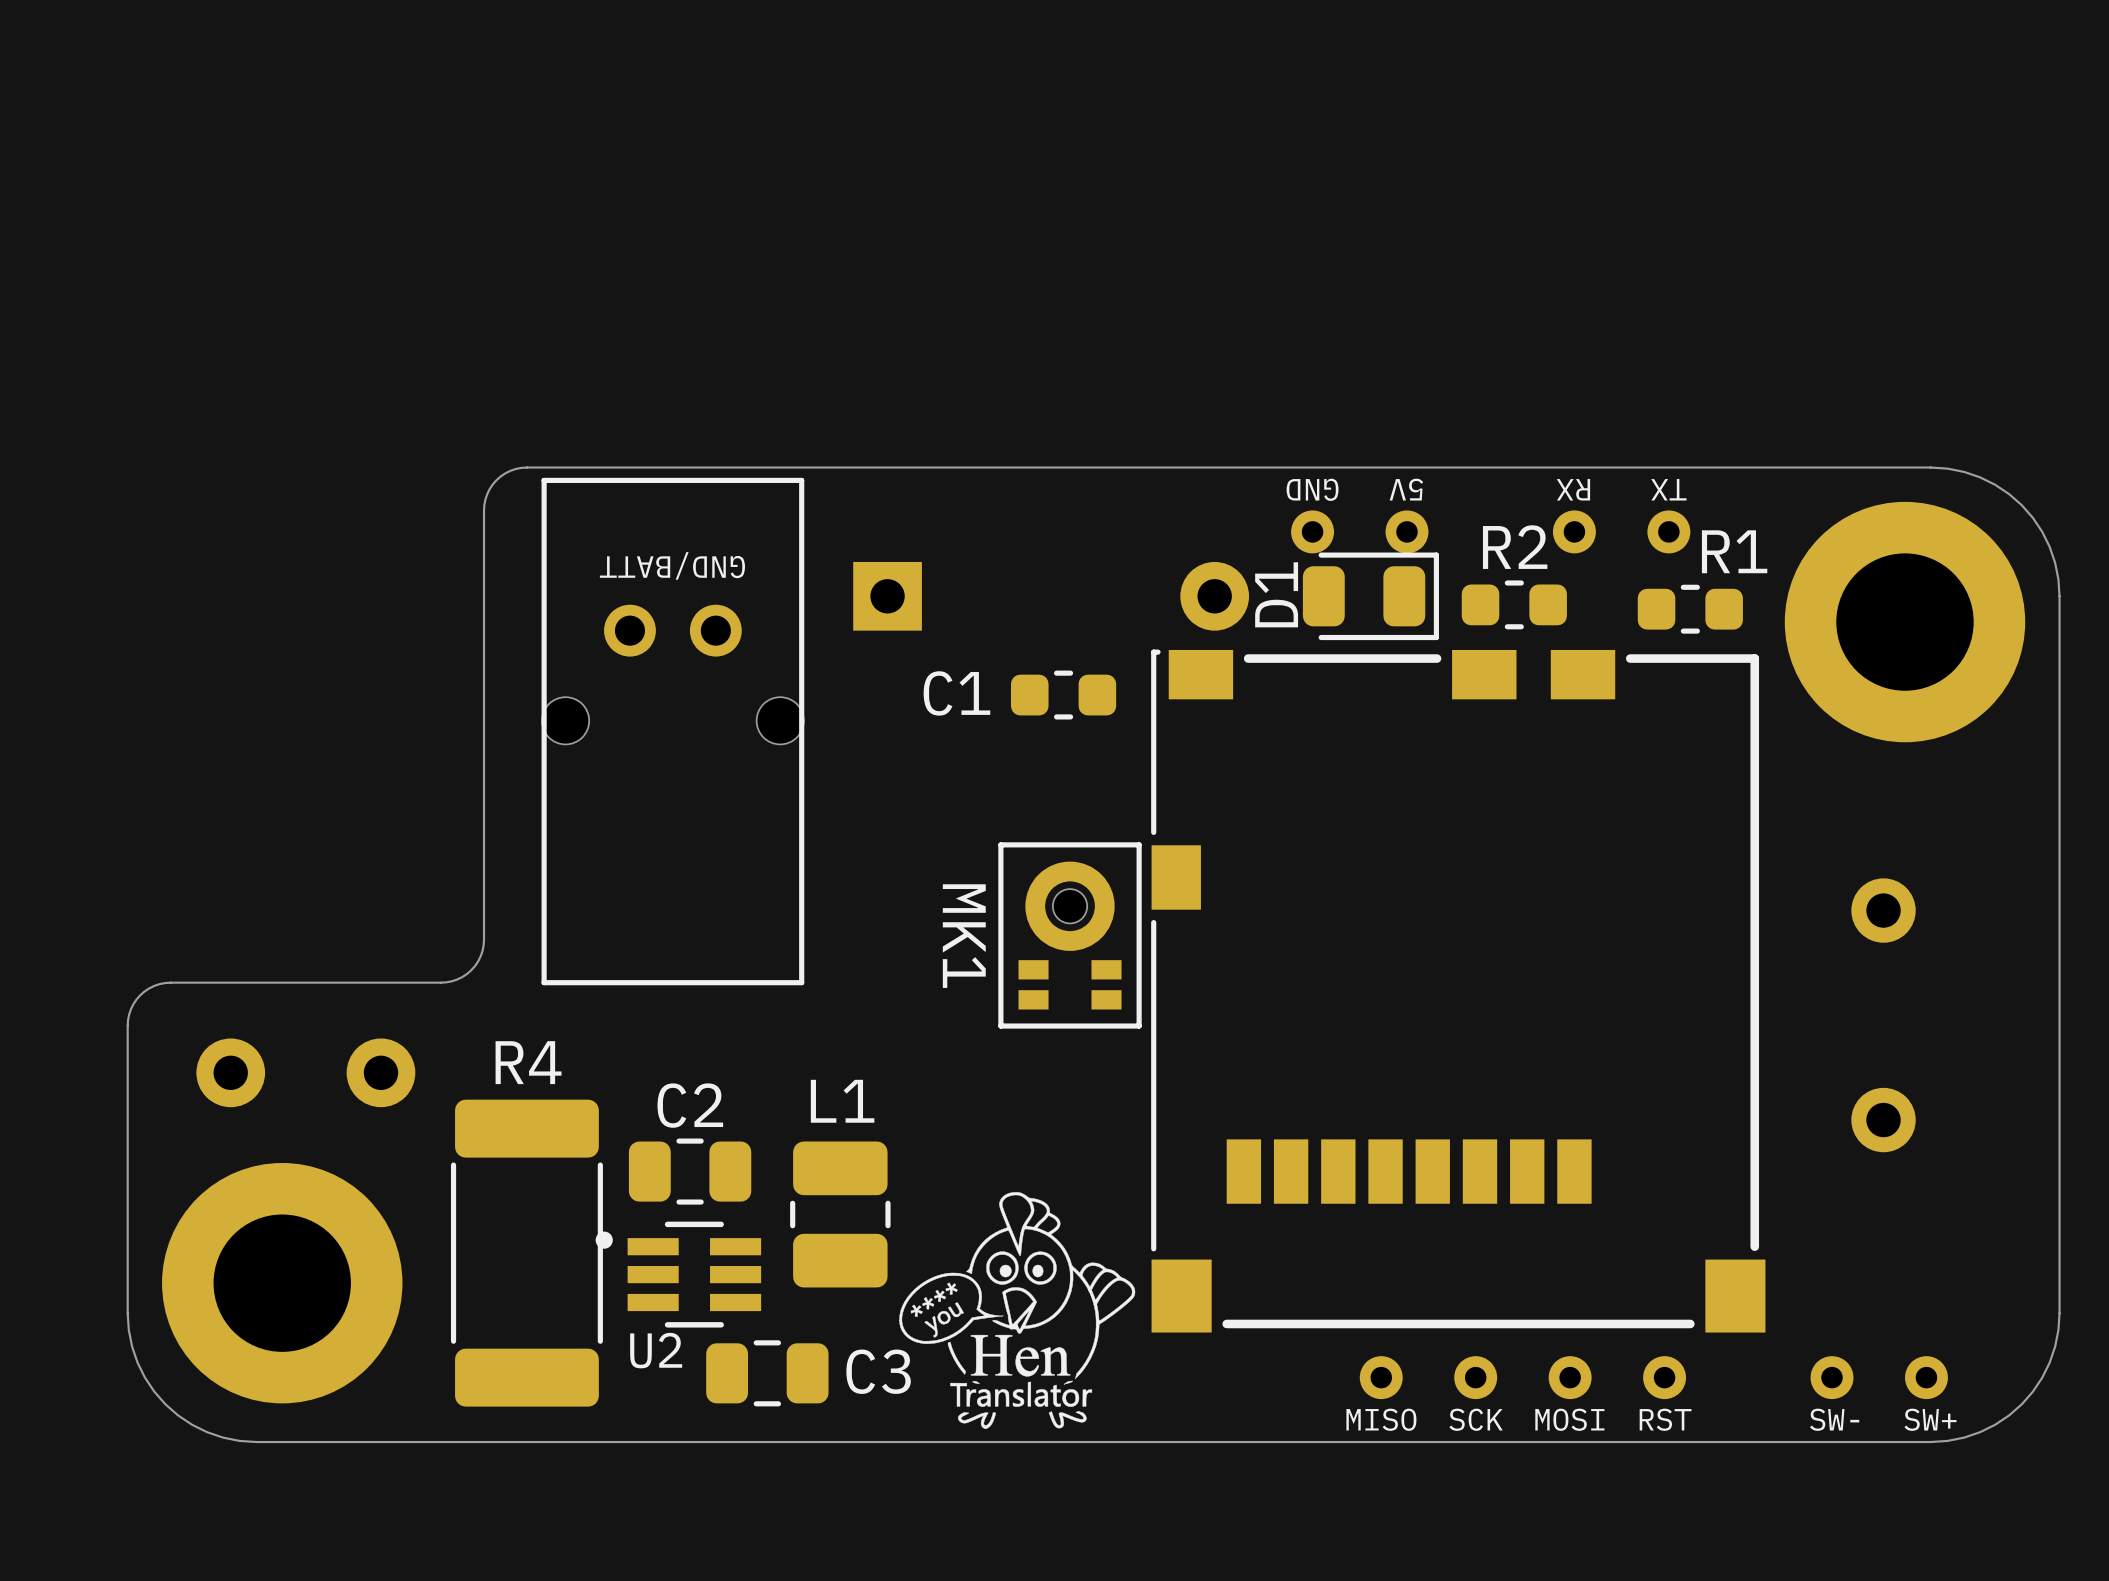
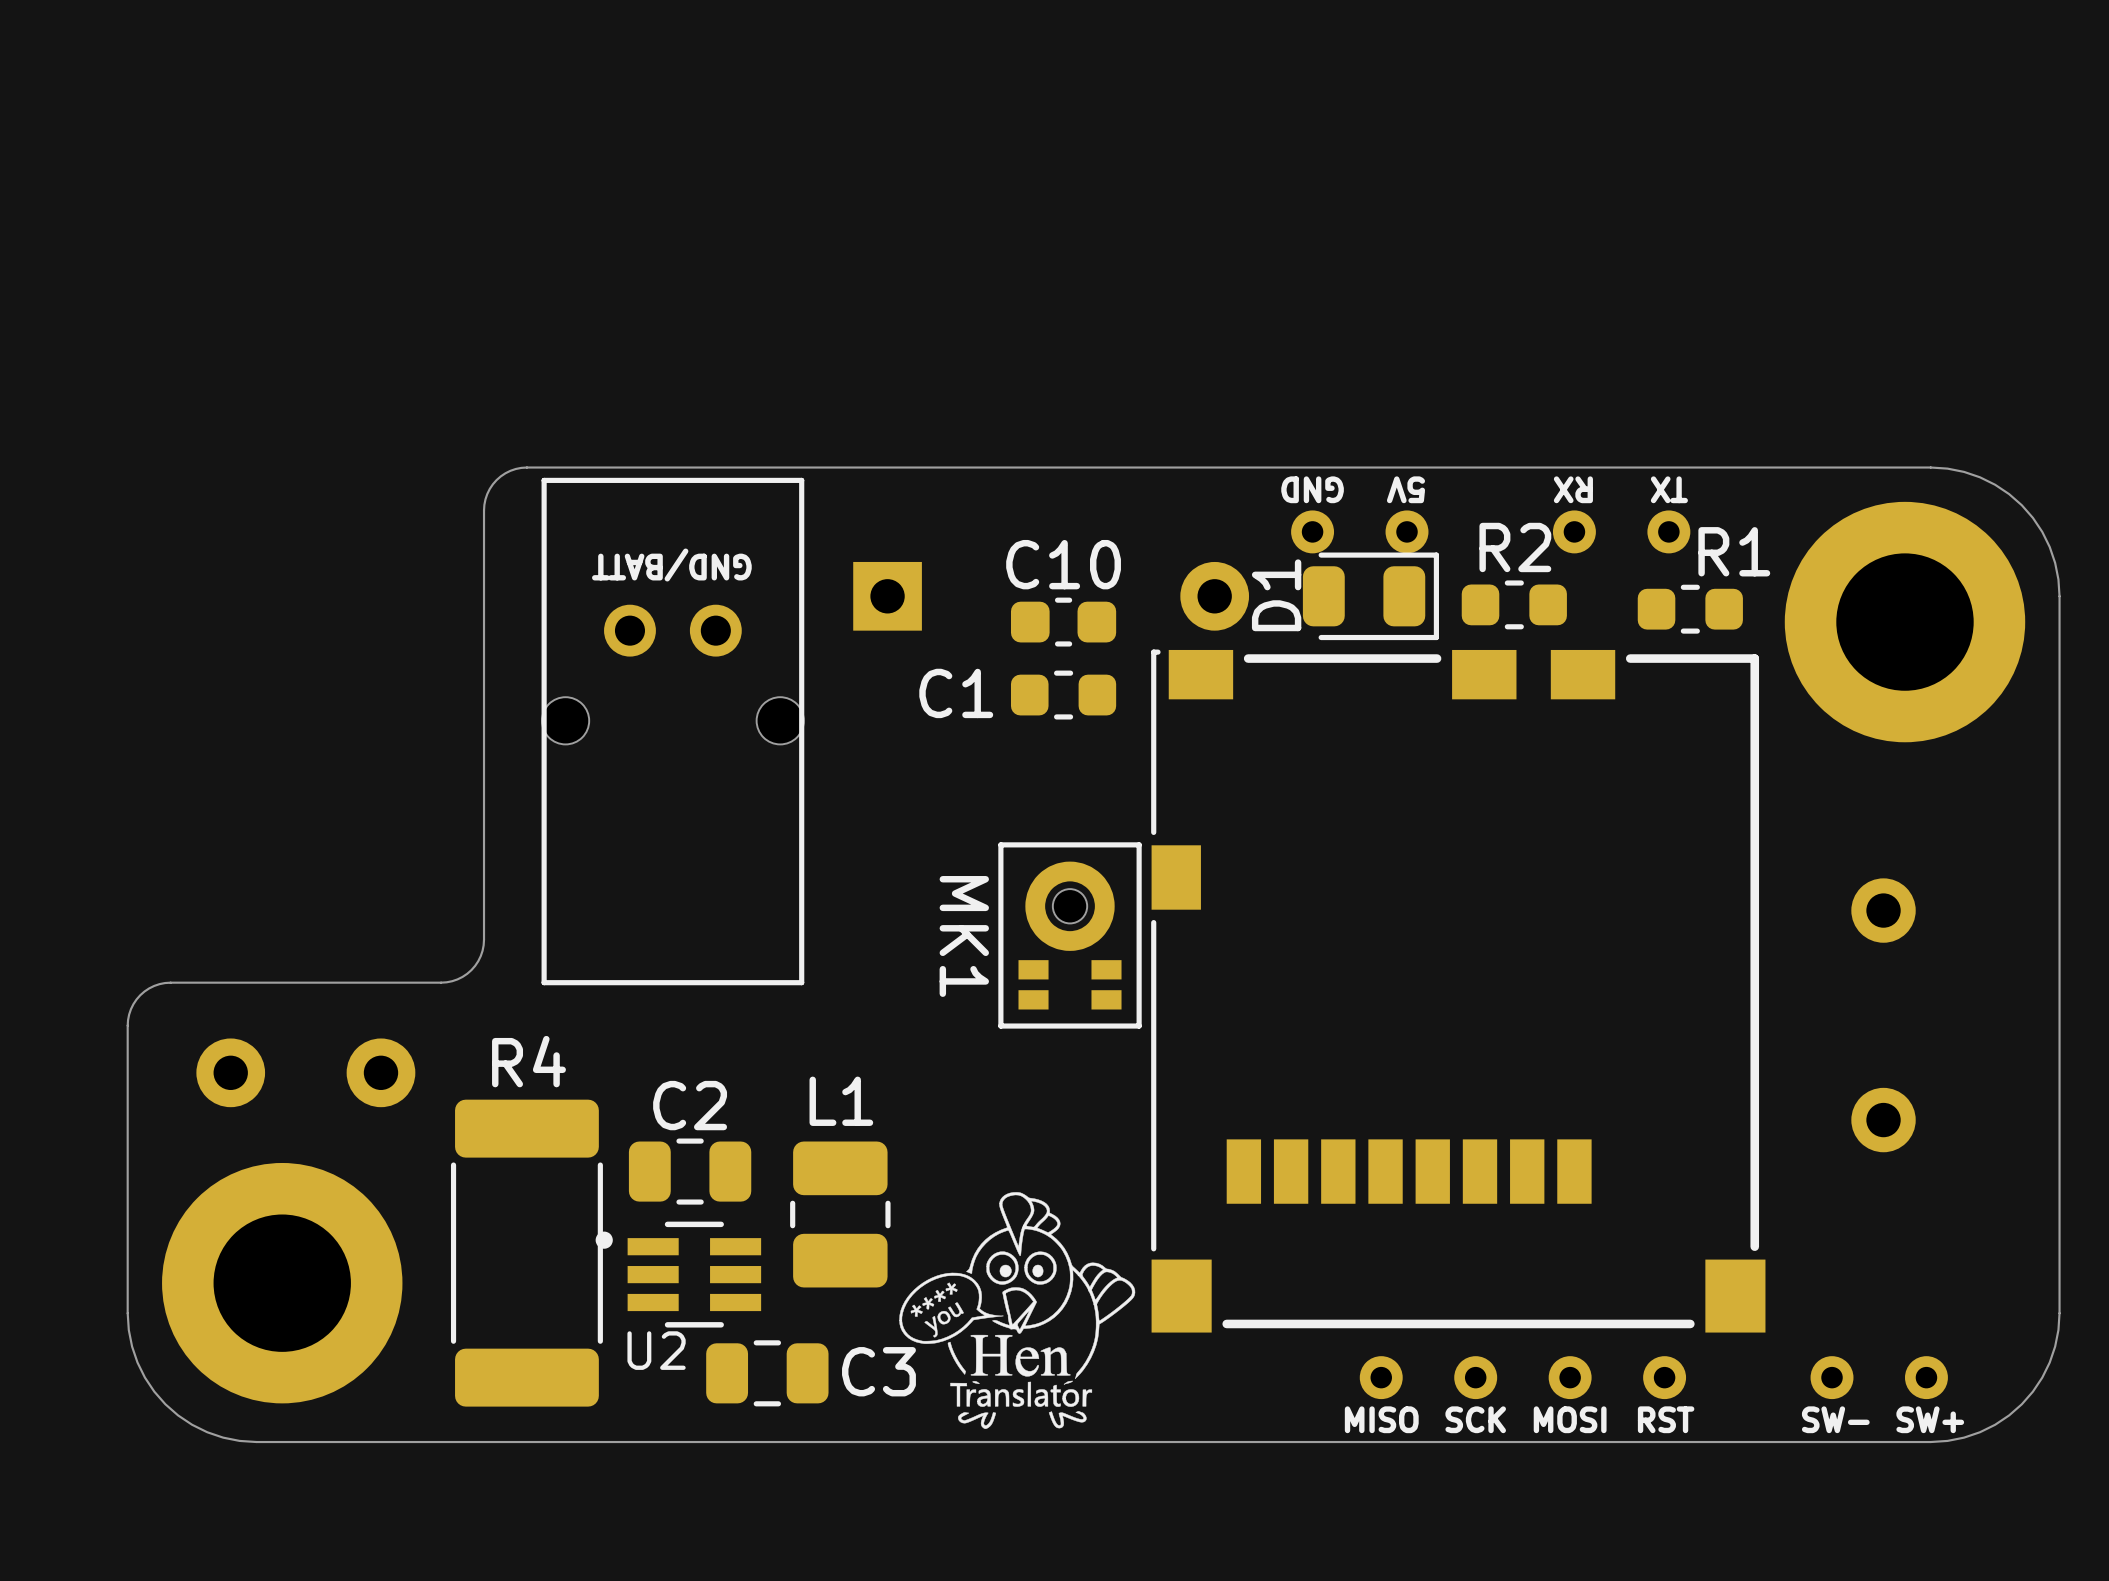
C10: none -> (1063, 622)

